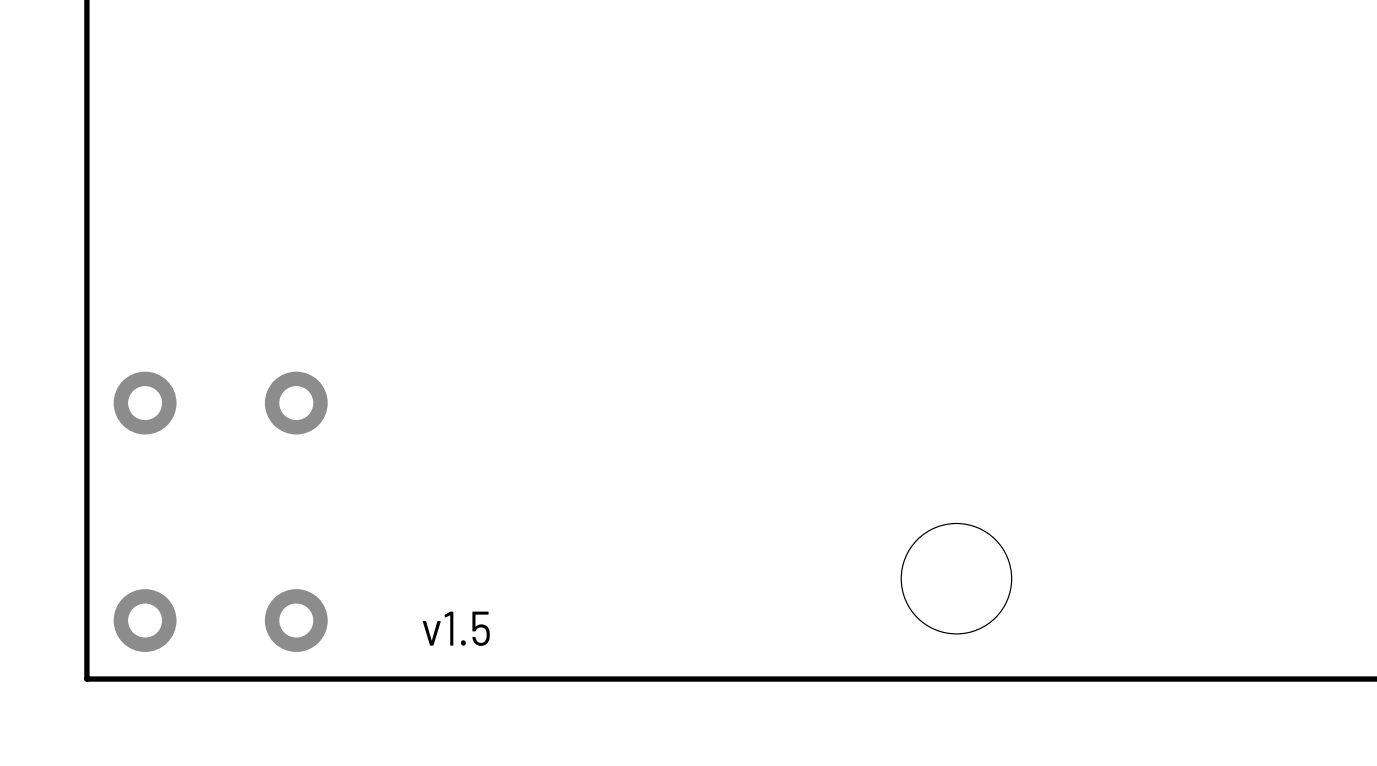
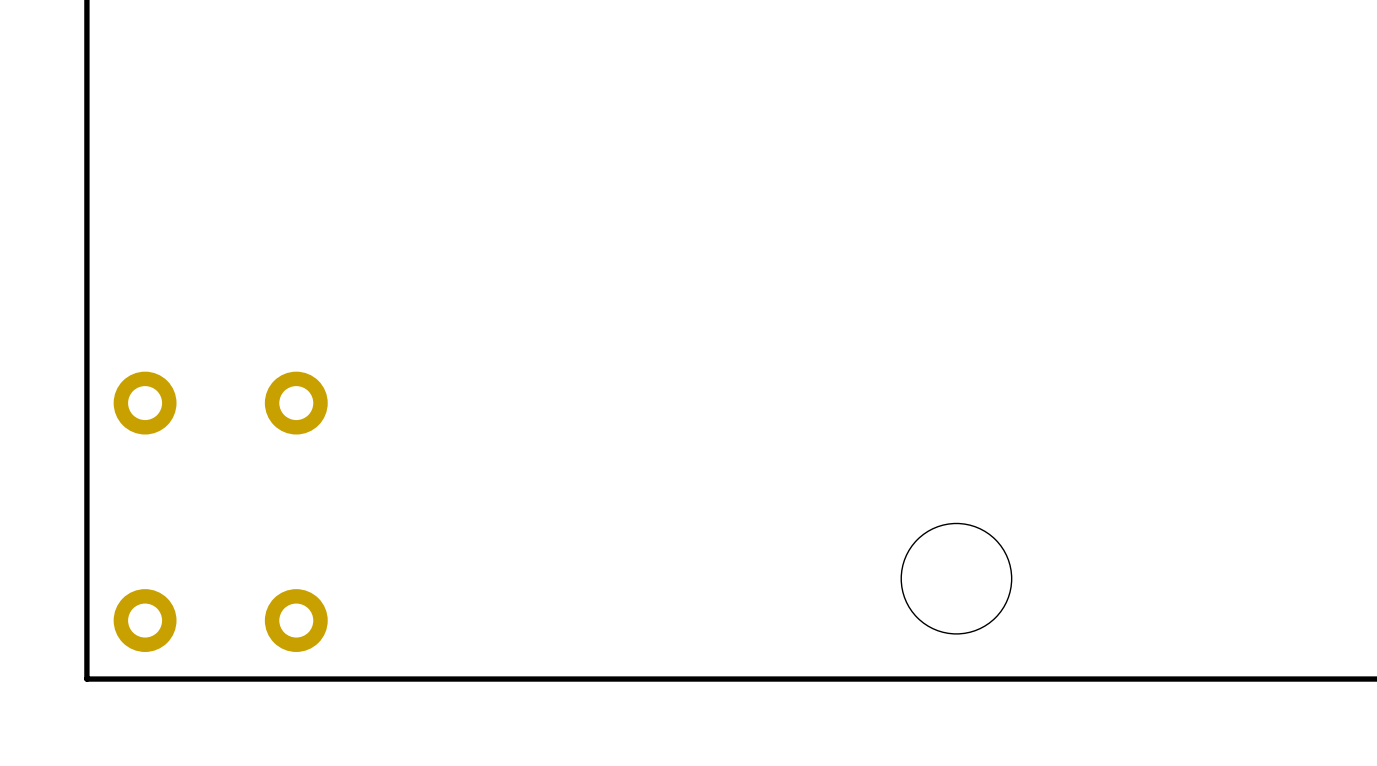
text: v1.5 (456, 628) -> none

